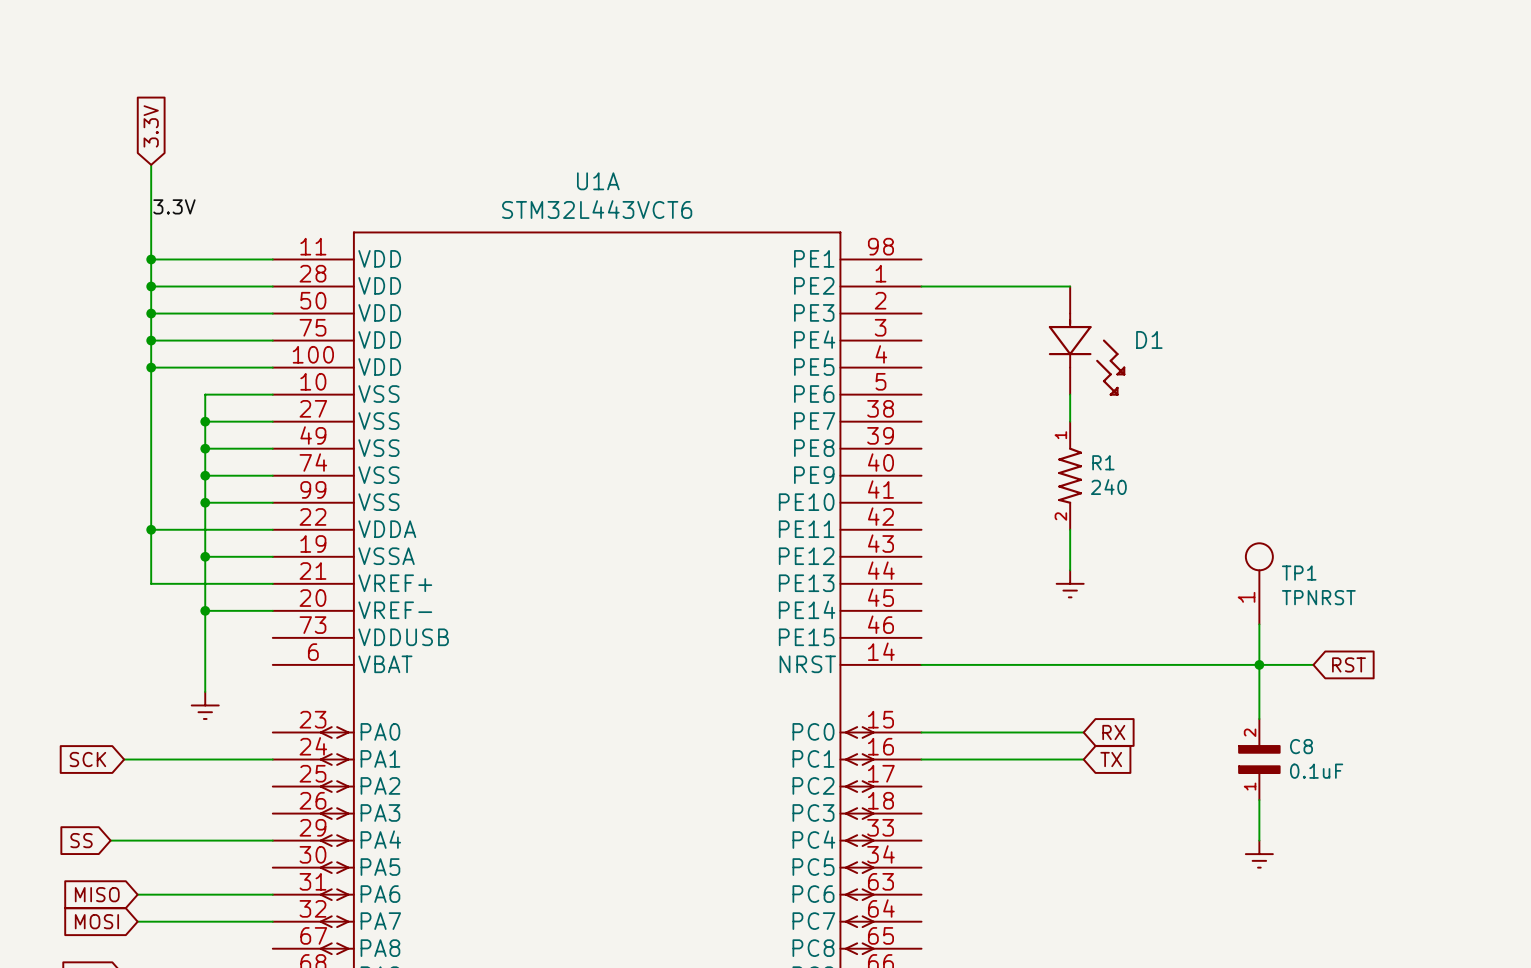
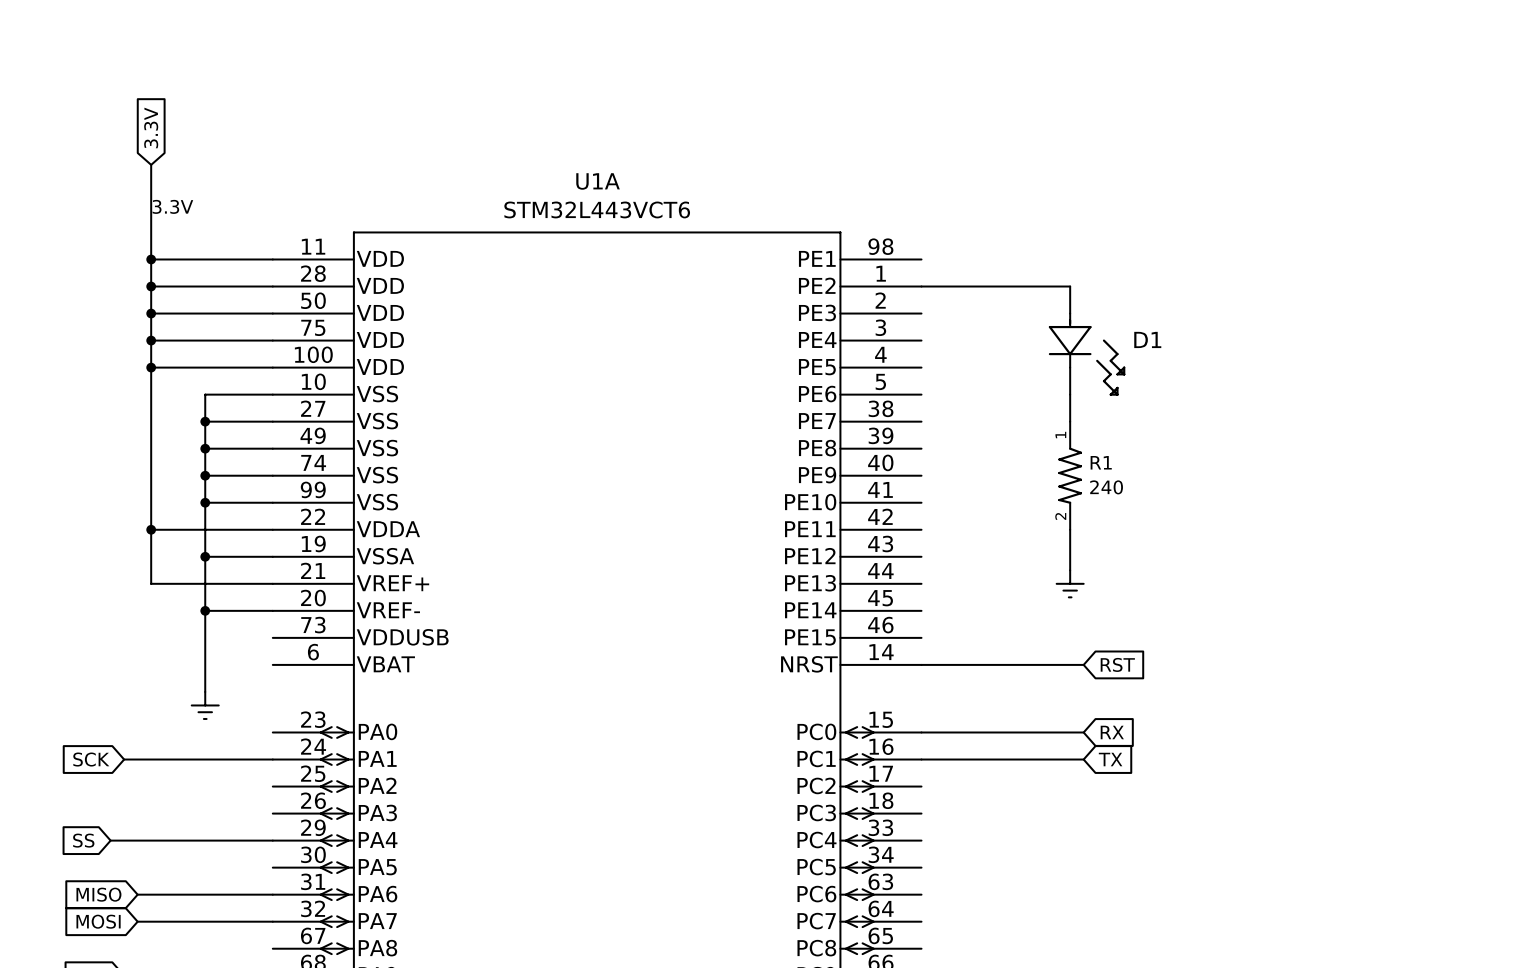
TP1: TPNRST (1259, 583) -> none
wire: (1259, 624) (1259, 718) -> none
wire: (1083, 664) (1313, 664) -> none
junction: (1259, 664) -> none
global label position: RST (1349, 664) -> RST (1117, 664)
C8: 0.1uF (1259, 759) -> none
wire: (1259, 800) (1259, 840) -> none
power symbol: (1259, 854) -> none

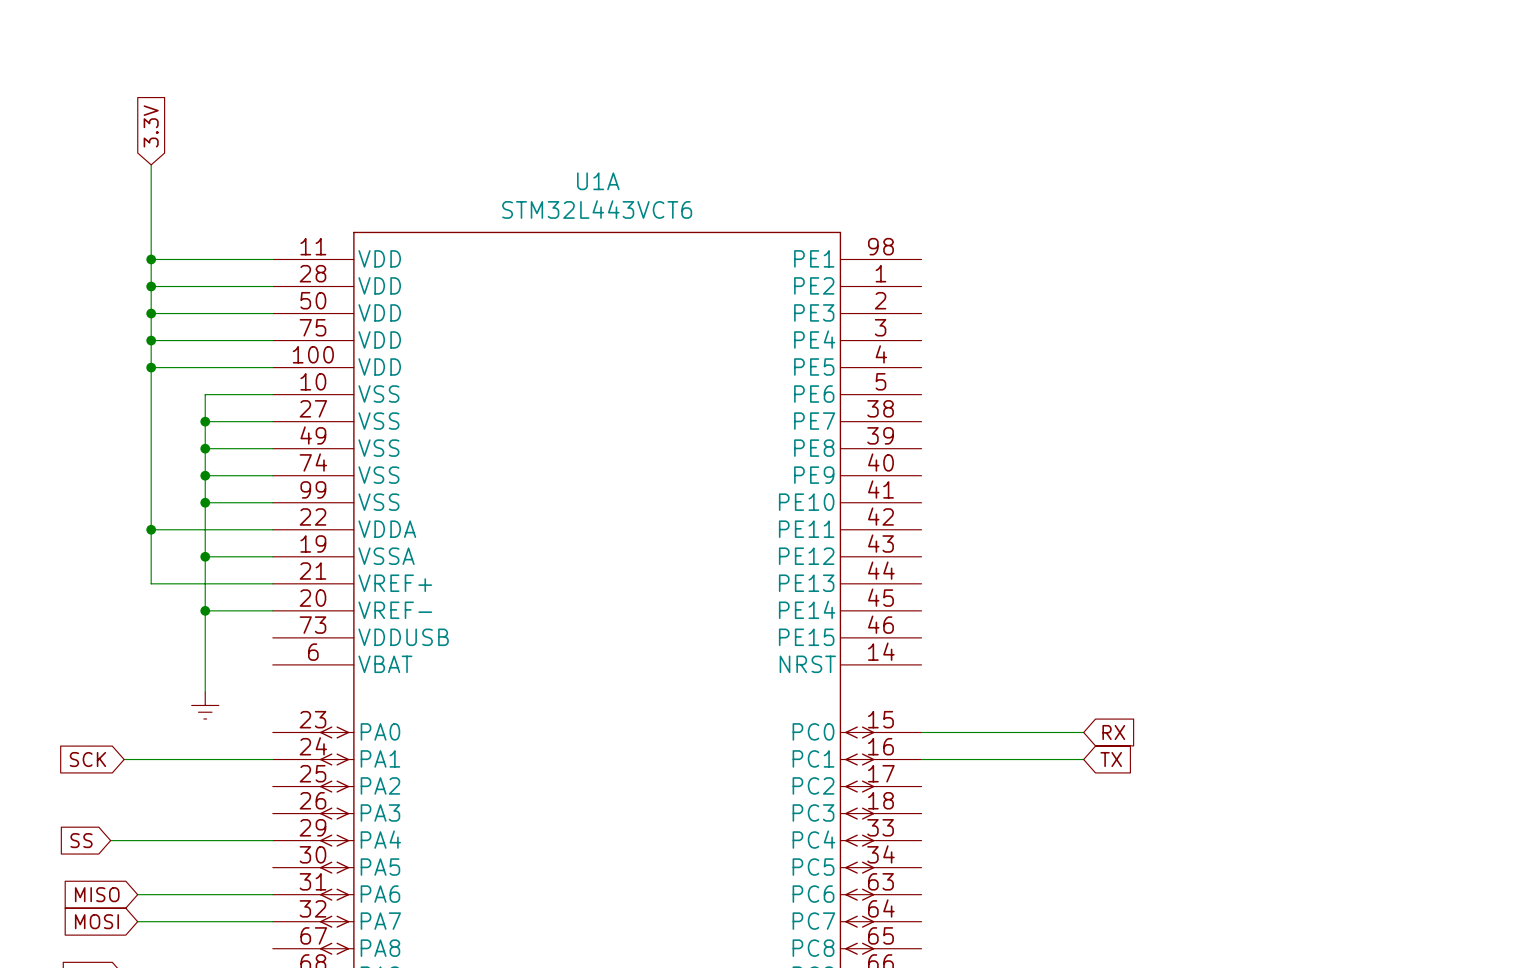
label: 3.3V (172, 206) -> none
wire: (921, 286) (1070, 286) -> none
D1: (1087, 341) -> none
wire: (1070, 394) (1070, 421) -> none
R1: 240 (1070, 475) -> none
wire: (1070, 529) (1070, 570) -> none
power symbol: (1070, 583) -> none
wire: (921, 664) (1083, 664) -> none
global label: RST (1117, 664) -> none

